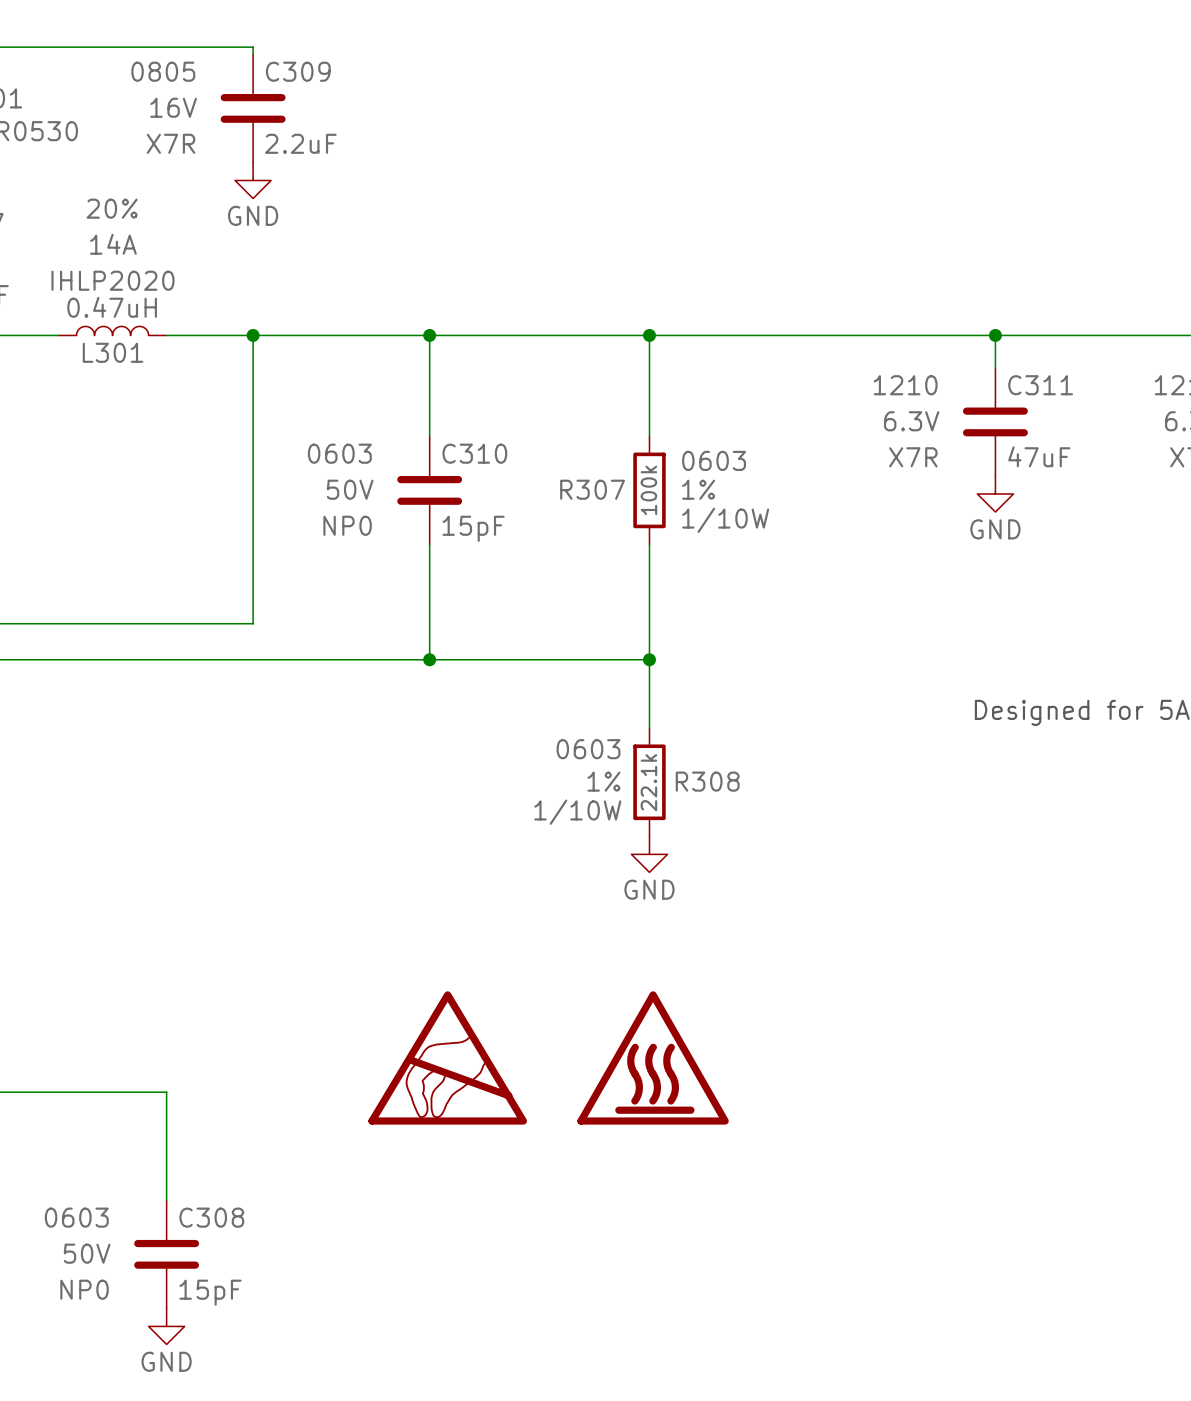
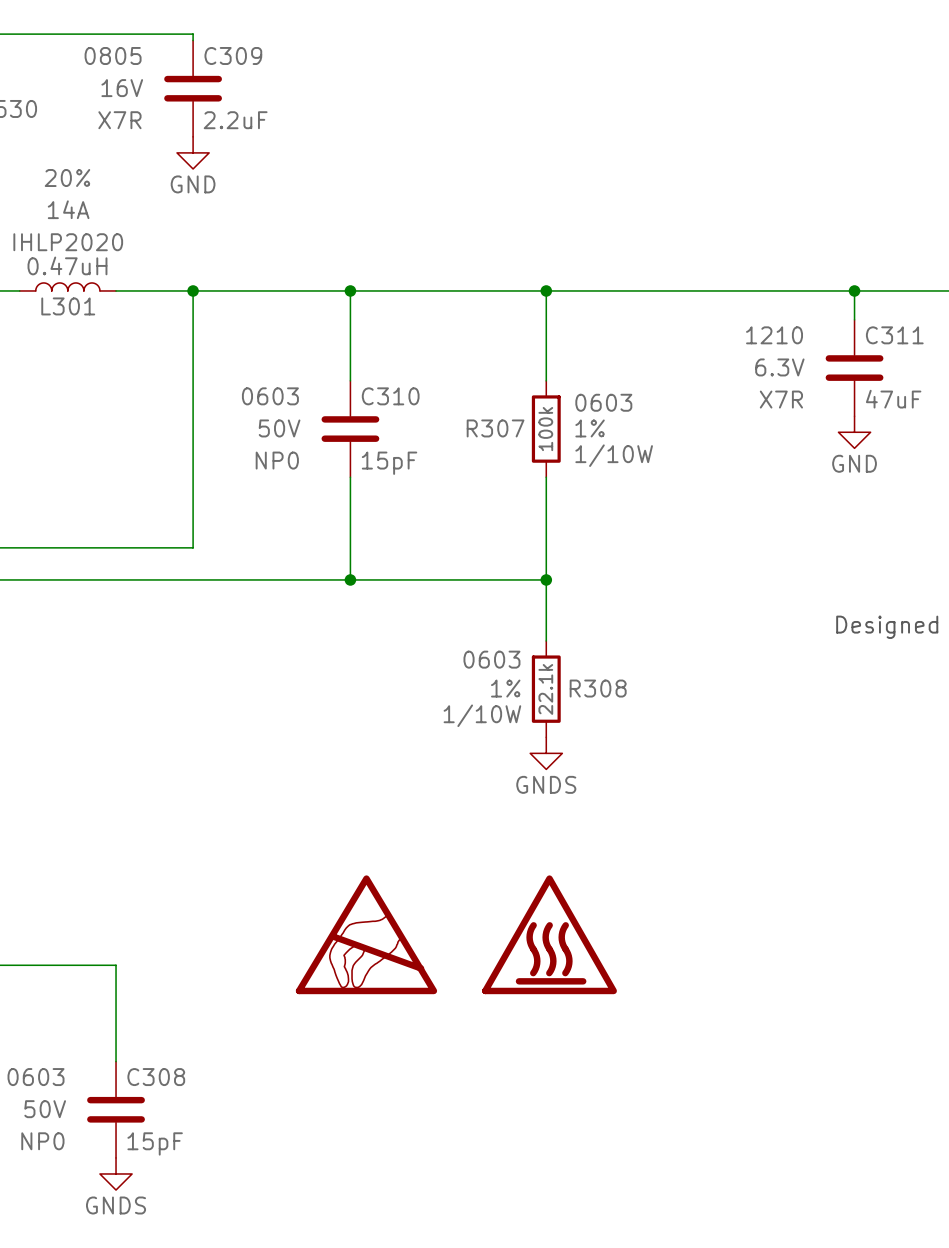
power symbol: GND (649, 854) -> GNDS (546, 753)
power symbol: GND (166, 1326) -> GNDS (116, 1173)

